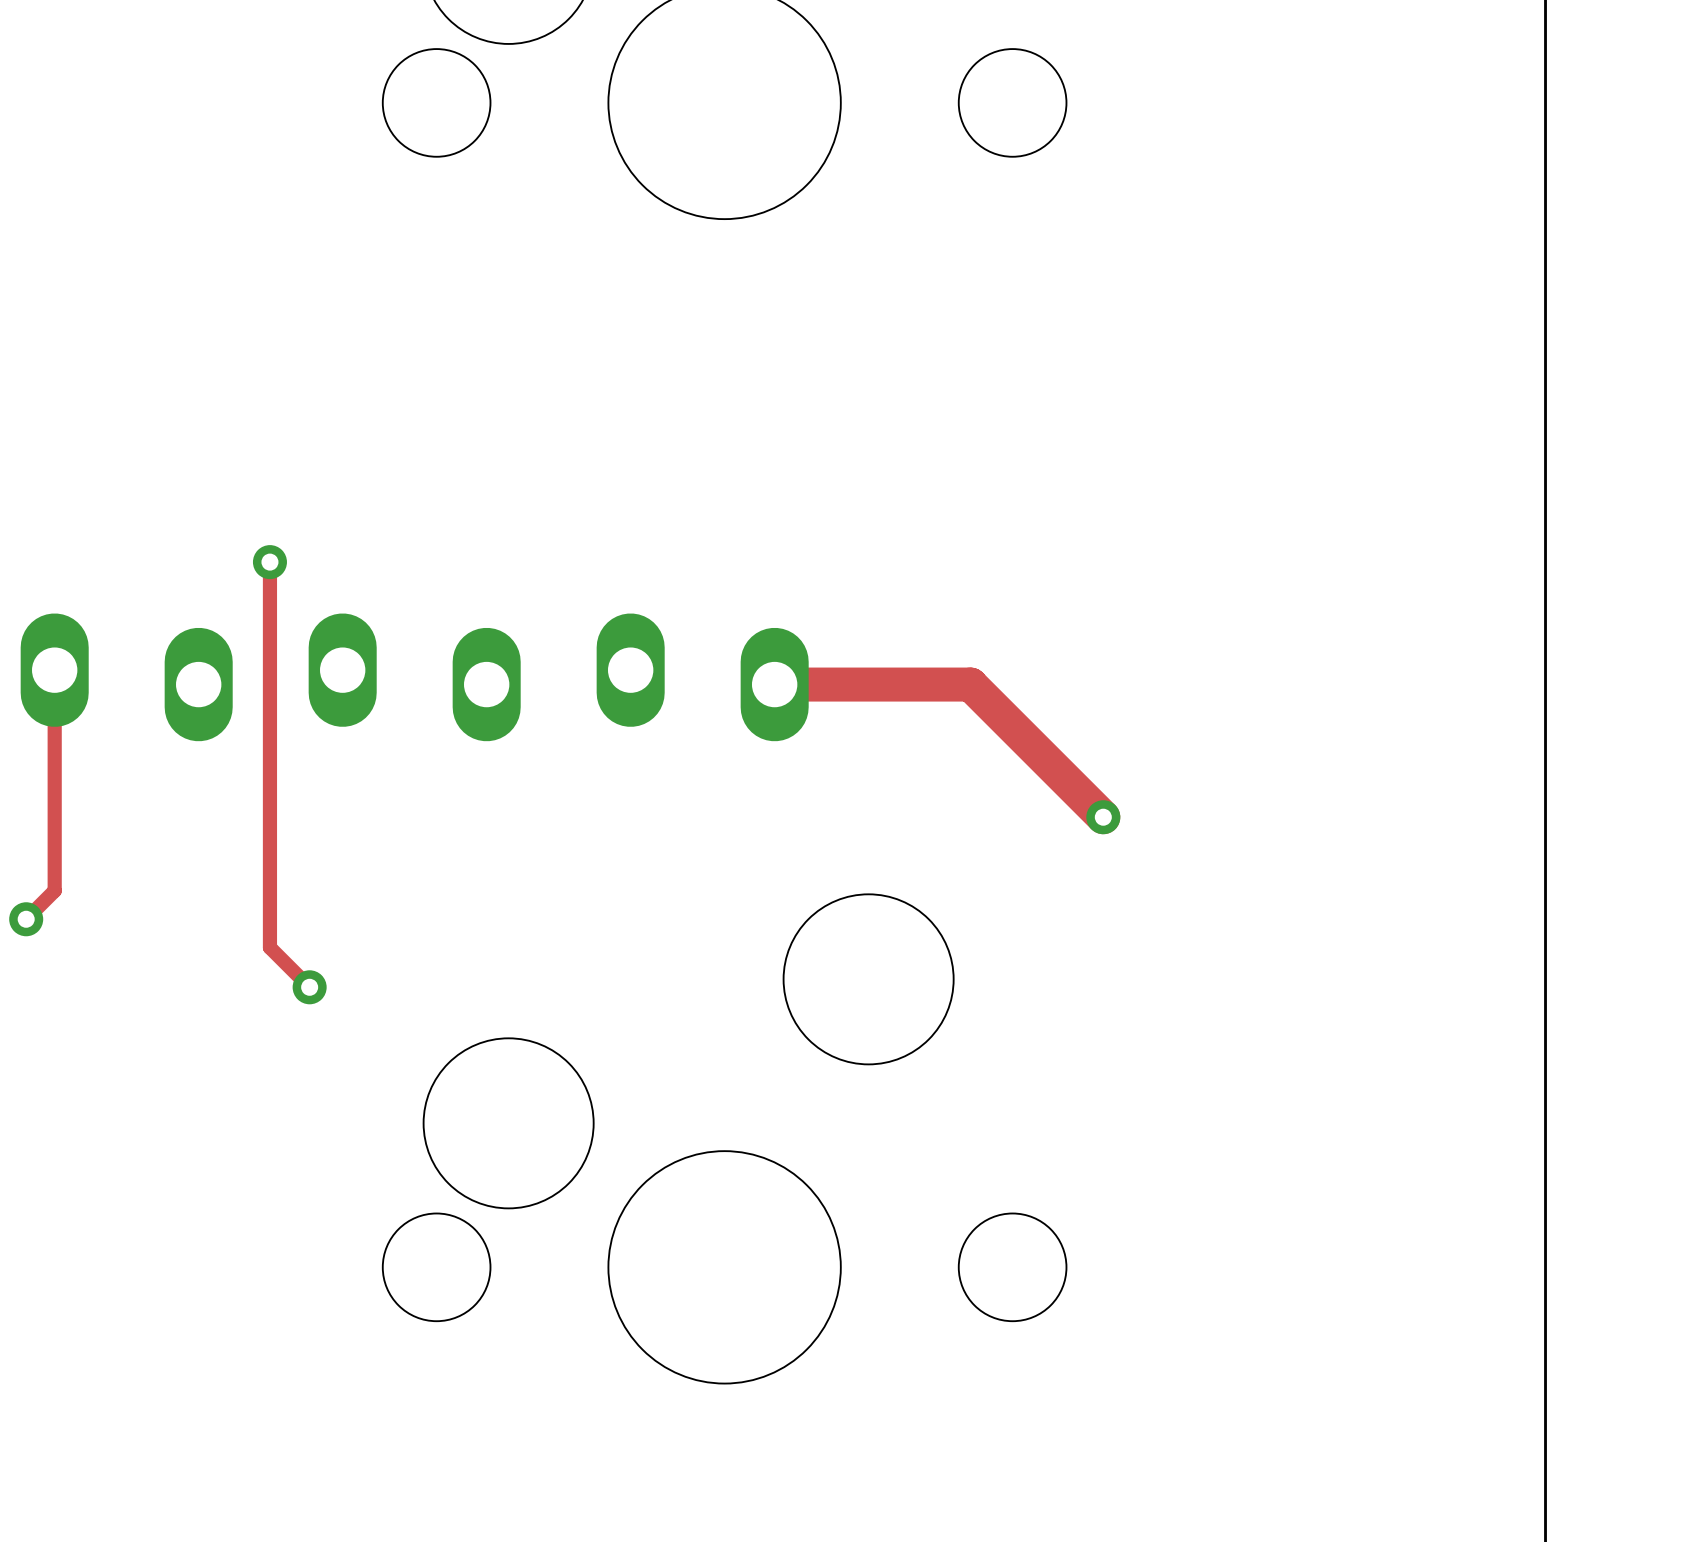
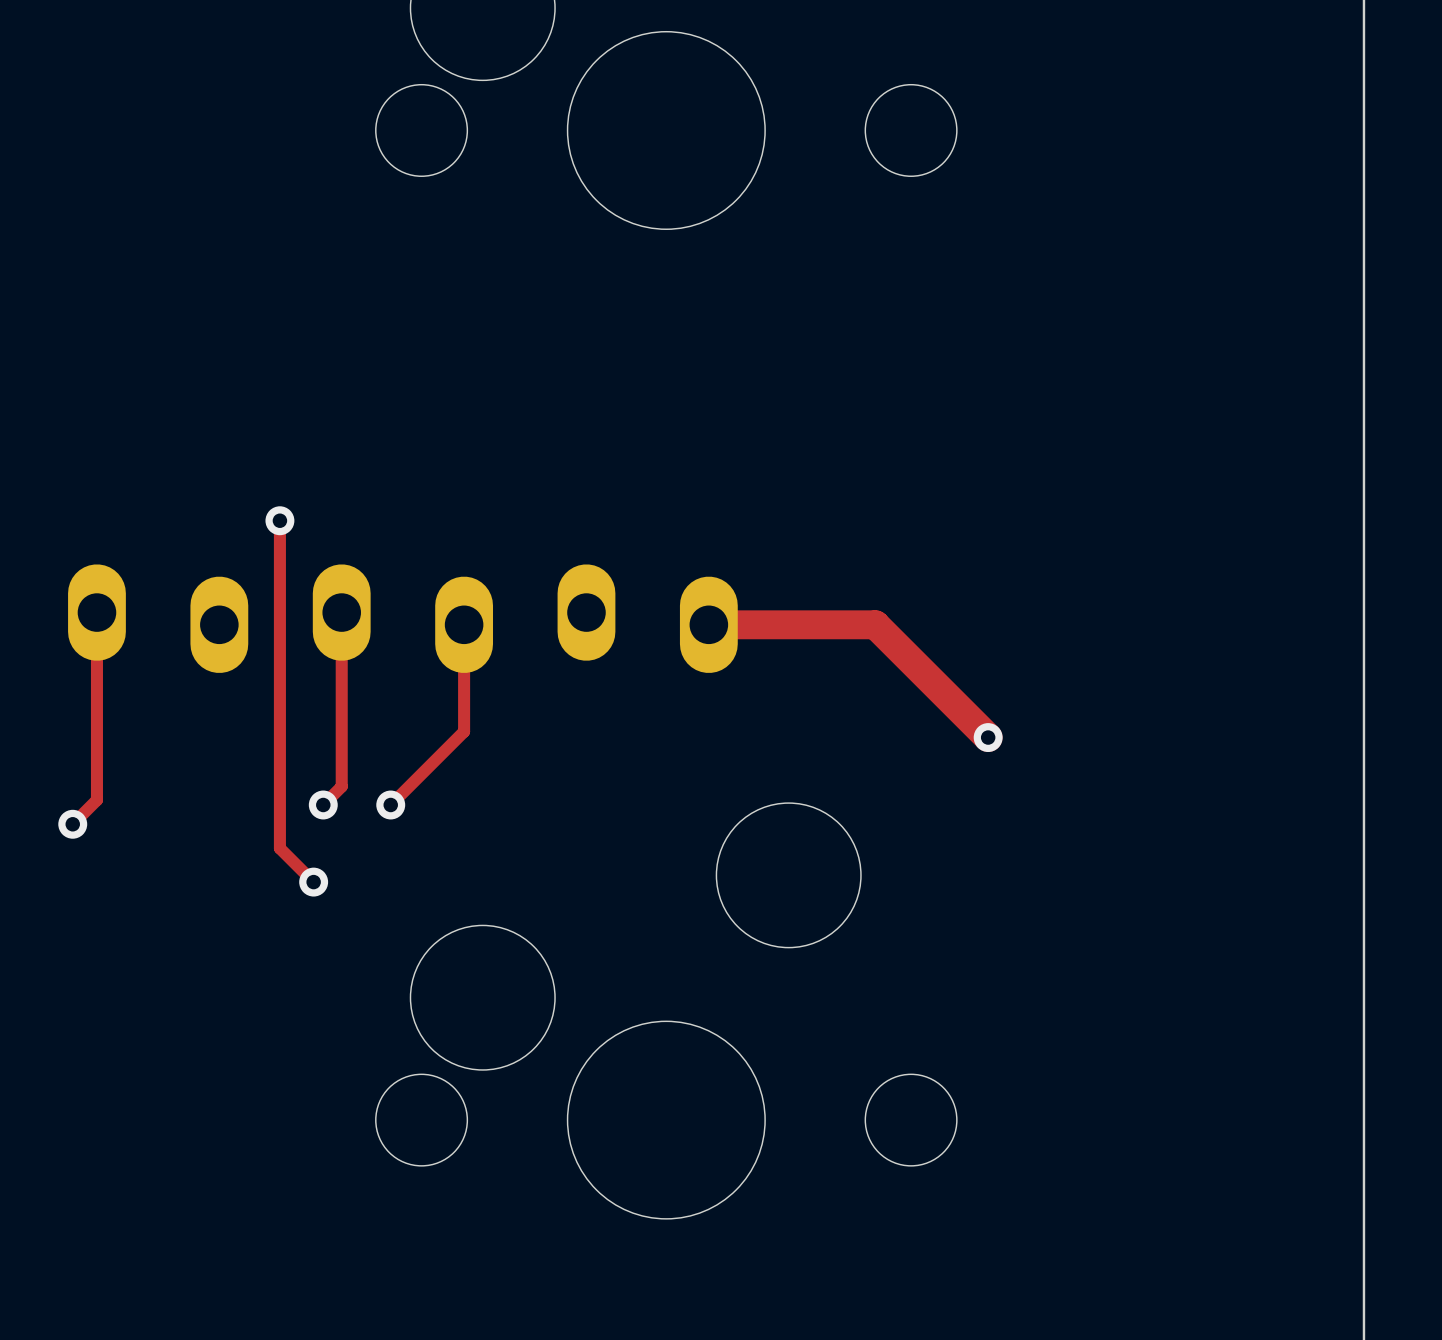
track: none -> (341, 612) (341, 786) (323, 805)
track: none -> (464, 624) (464, 731) (390, 805)
via: none -> (323, 805)
via: none -> (390, 805)

